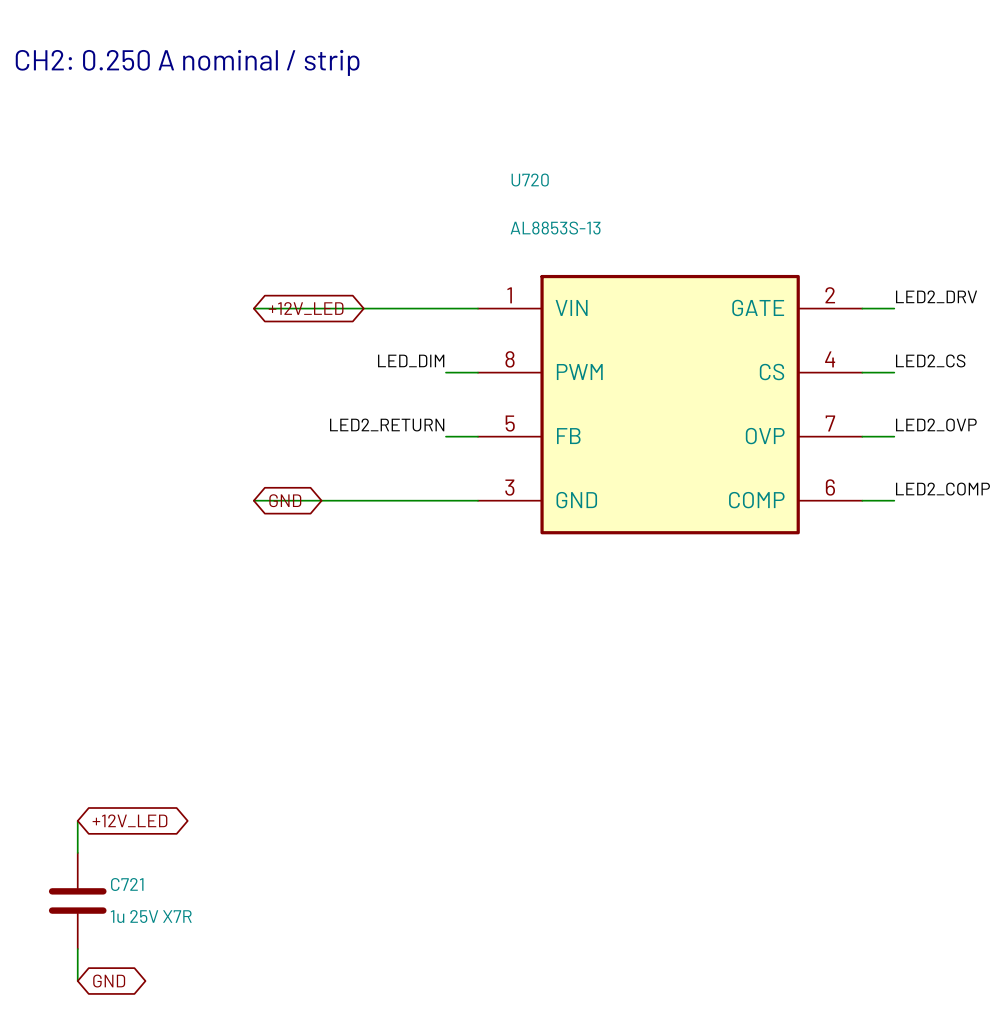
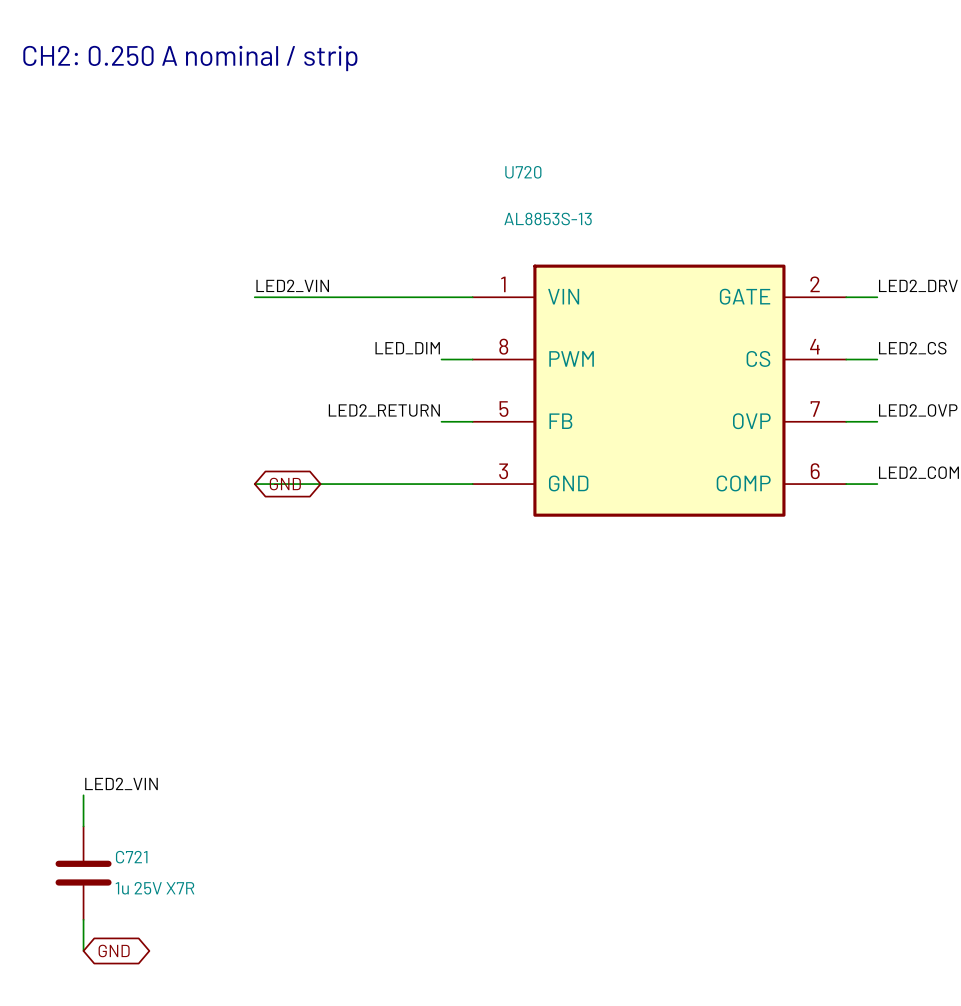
label: none -> LED2_VIN (292, 285)
global label: +12V_LED (306, 308) -> none
label: none -> LED2_VIN (121, 783)
global label: +12V_LED (129, 820) -> none

